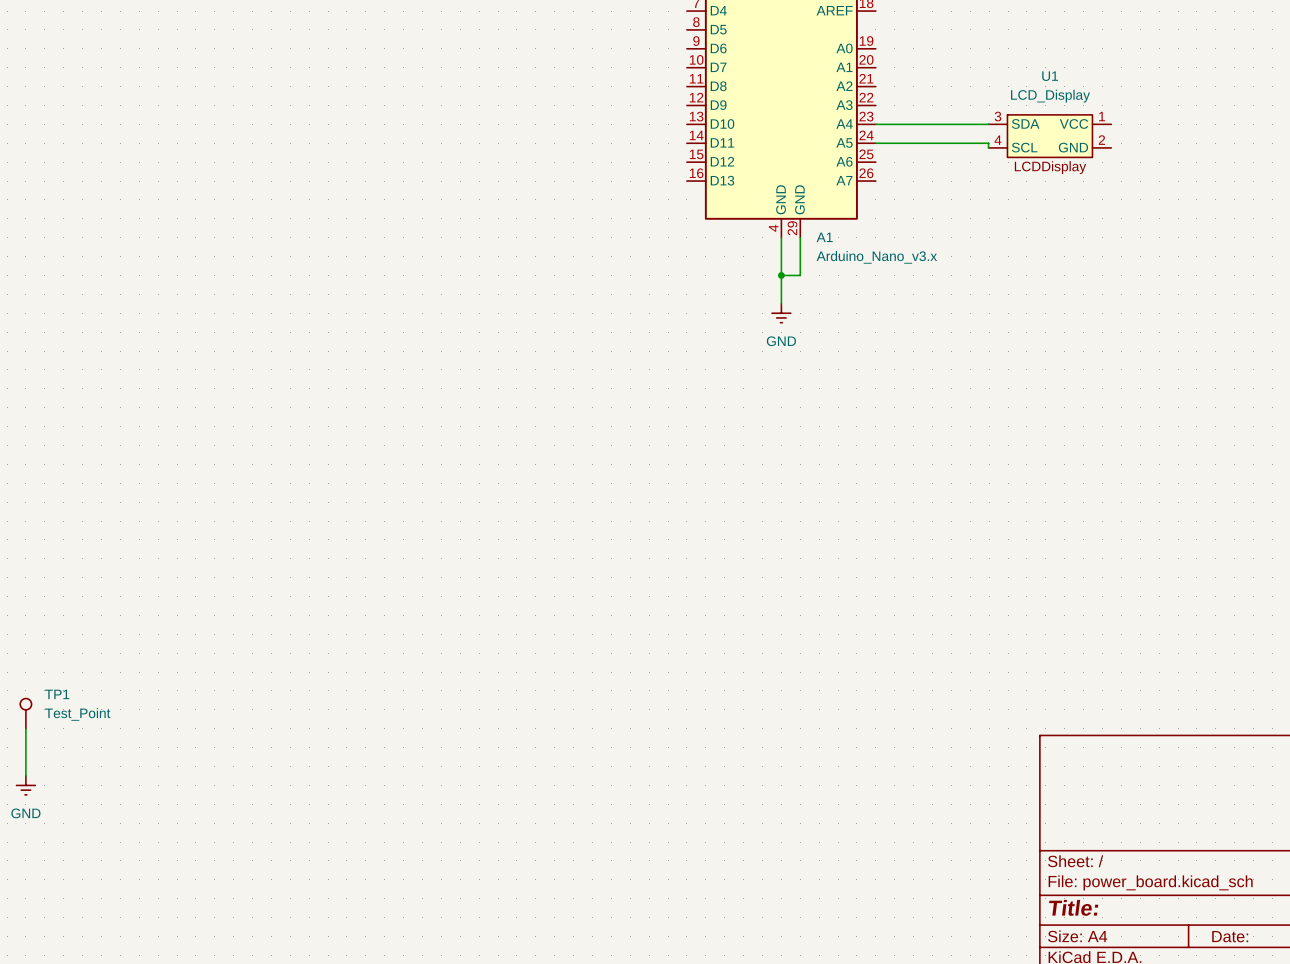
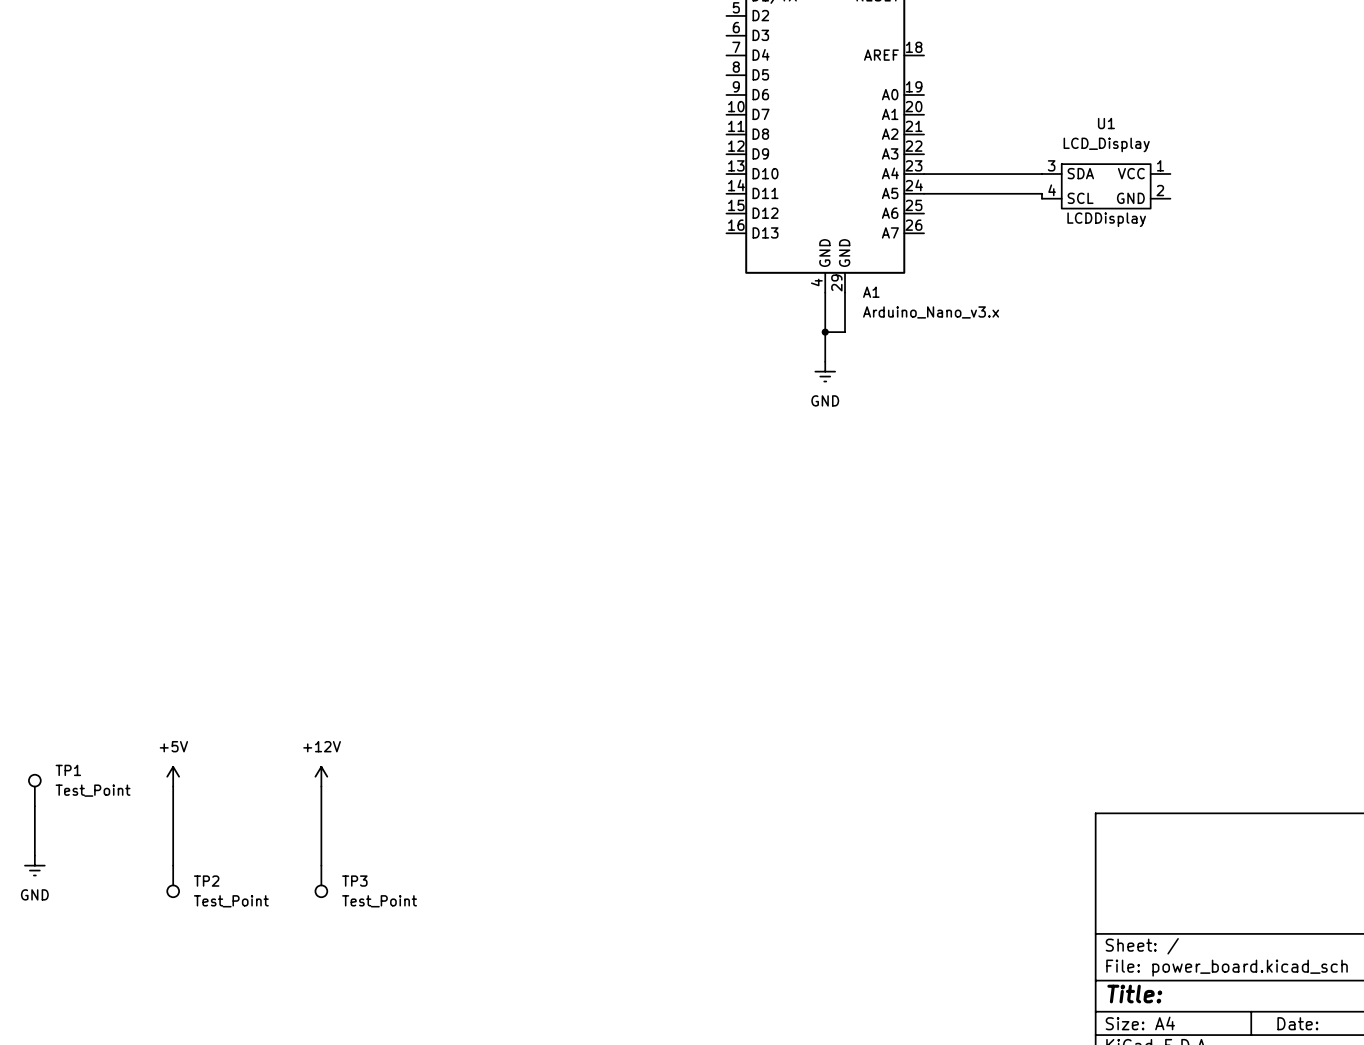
power symbol: none -> +5V (173, 776)
power symbol: none -> +12V (321, 776)
wire: none -> (173, 786) (173, 865)
wire: none -> (321, 786) (321, 865)
TP2: none -> Test_Point (173, 881)
TP3: none -> Test_Point (321, 881)

